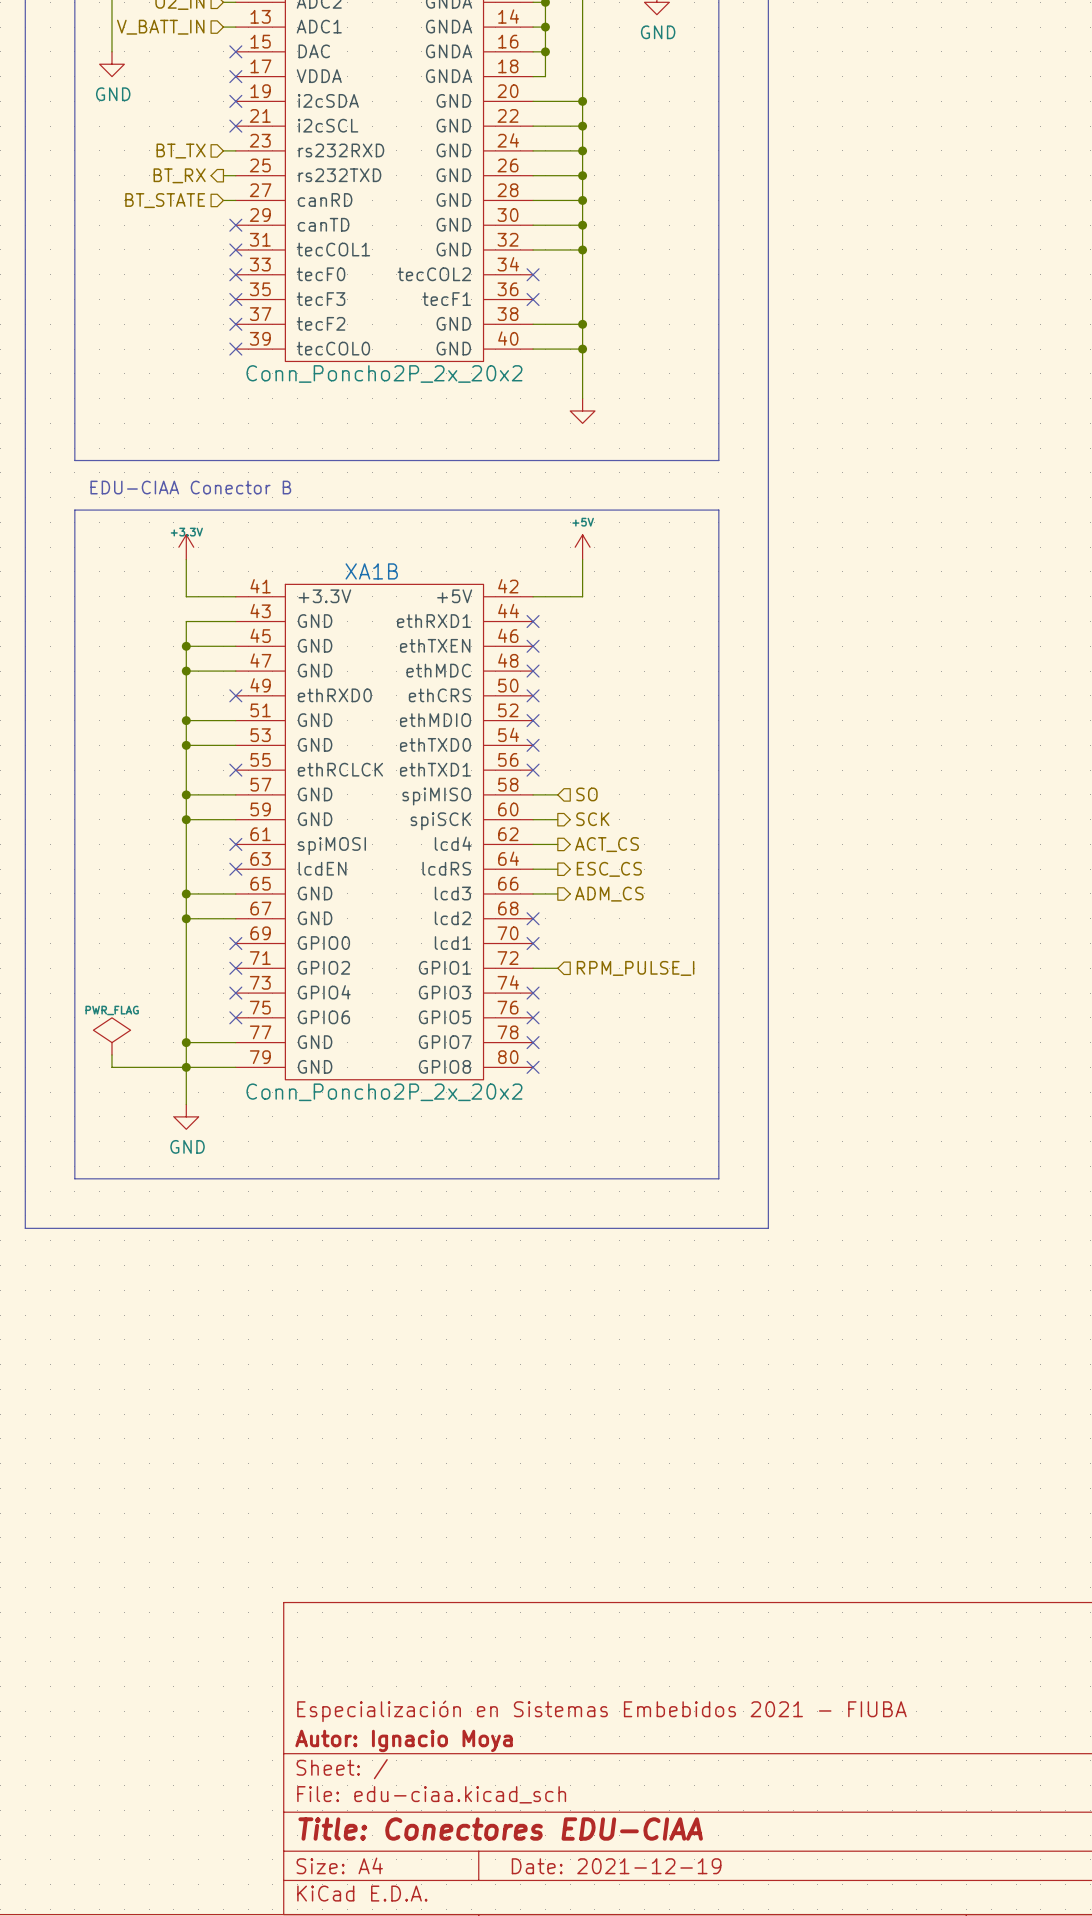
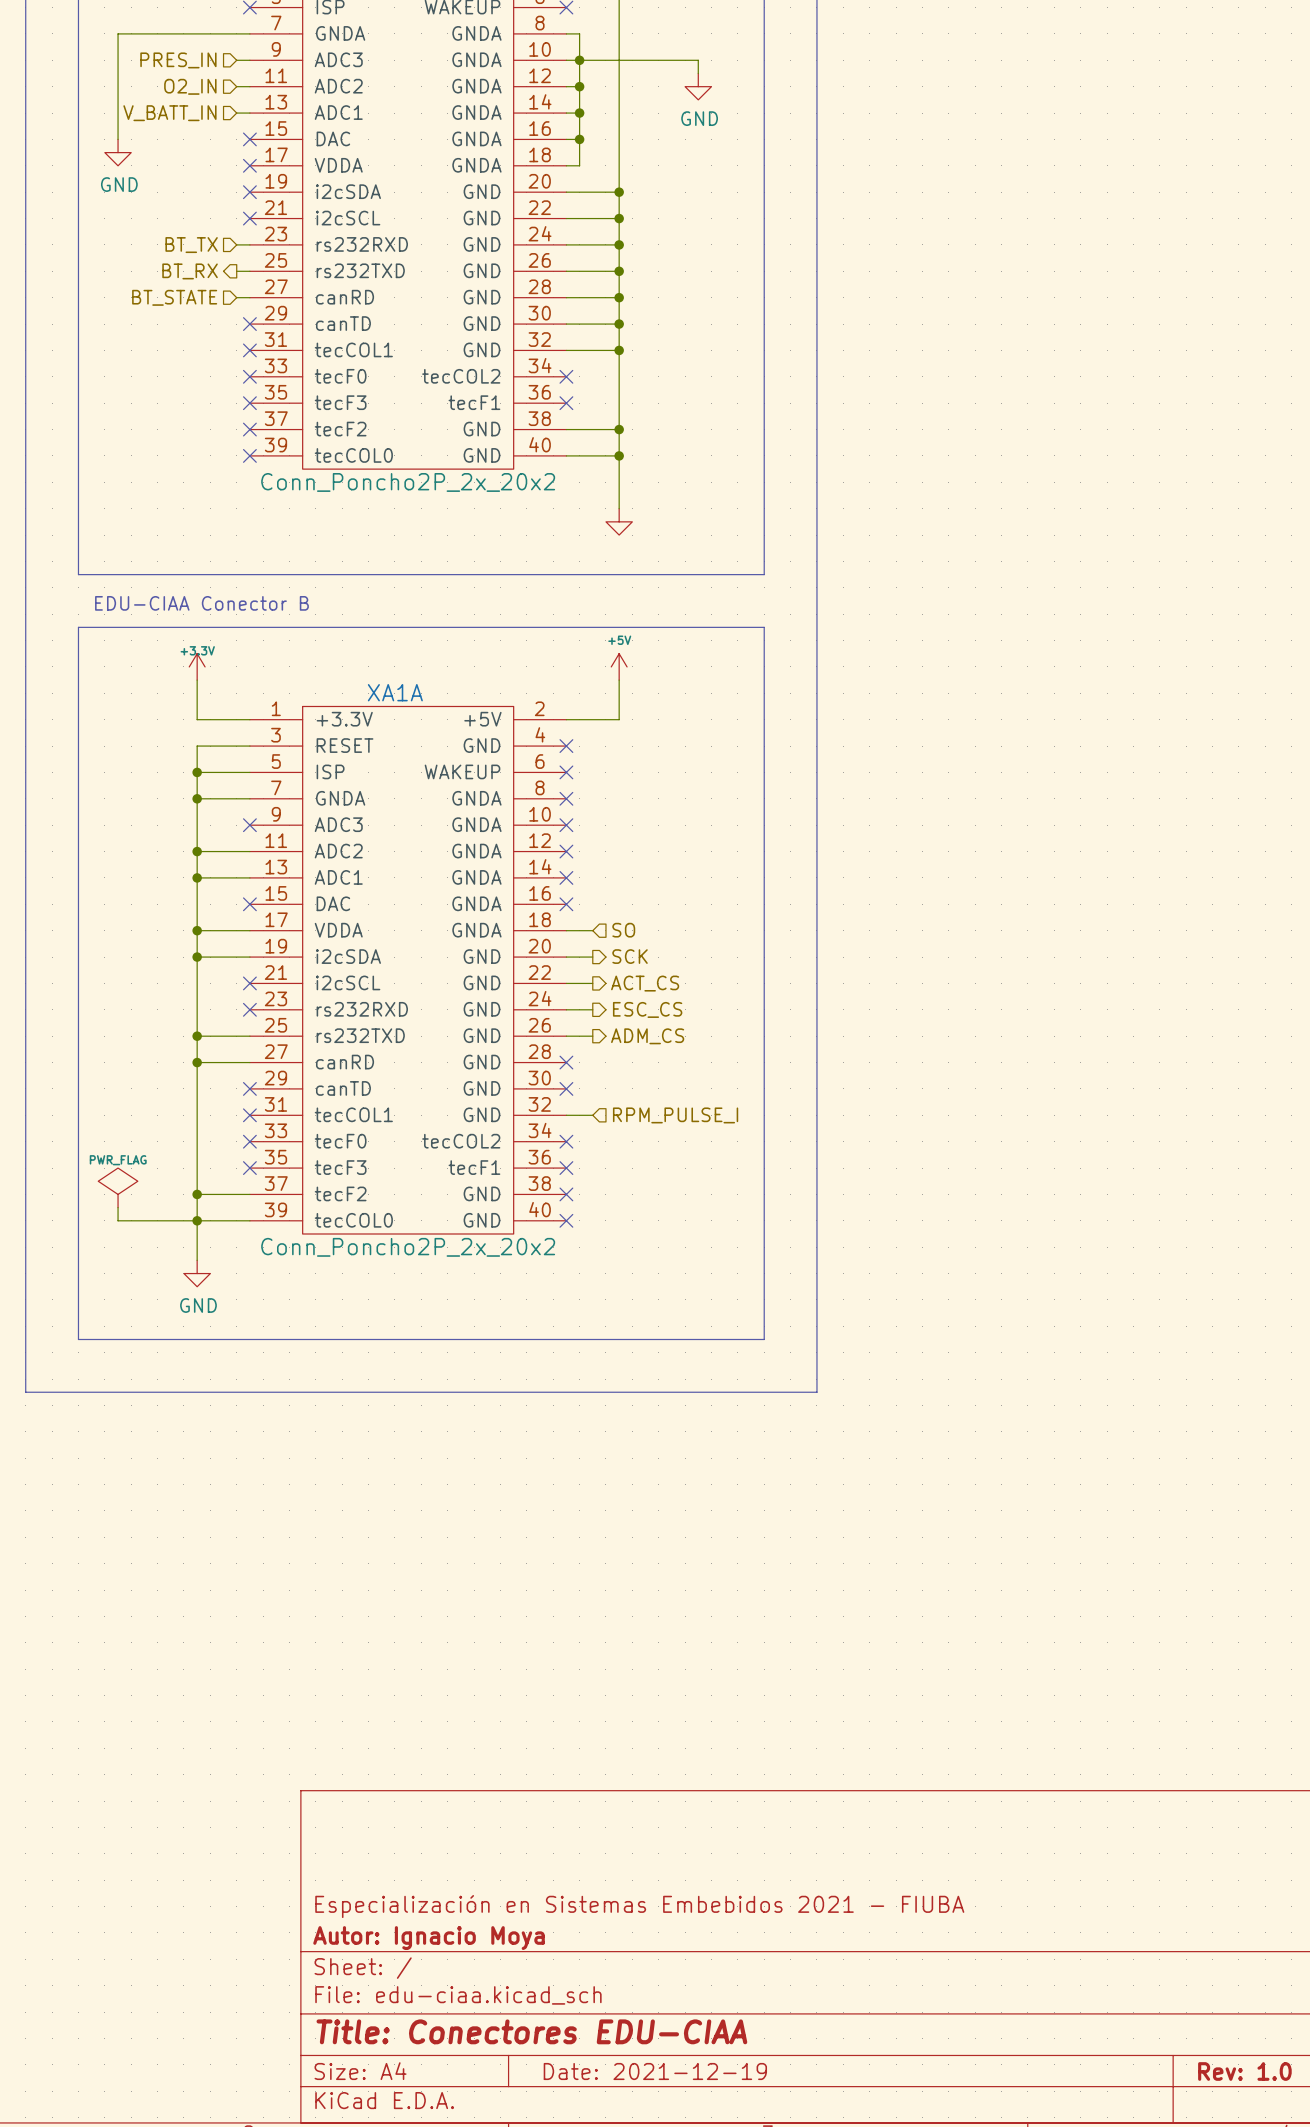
XA1B name: XA1B (371, 571) -> XA1A (395, 692)
XA1B symbol: [235, 584, 534, 1080] -> [249, 706, 567, 1234]

